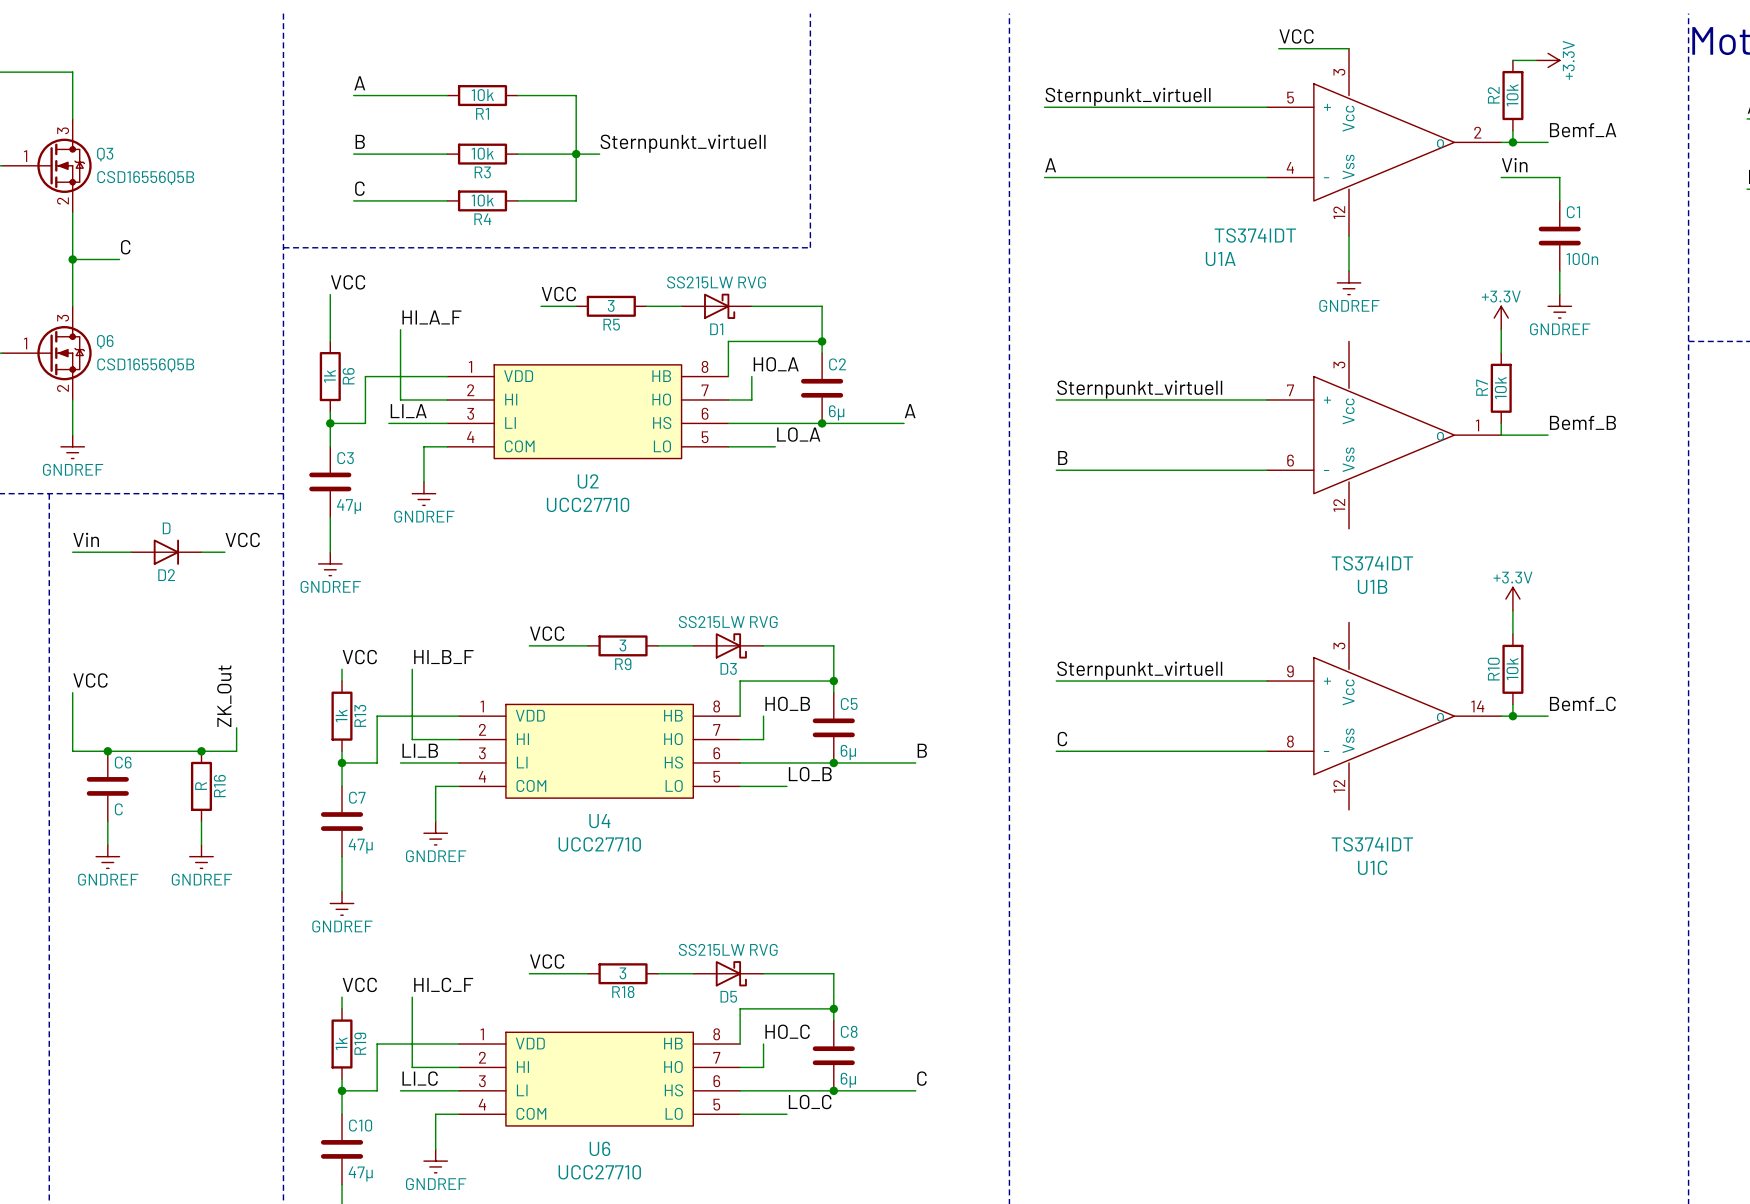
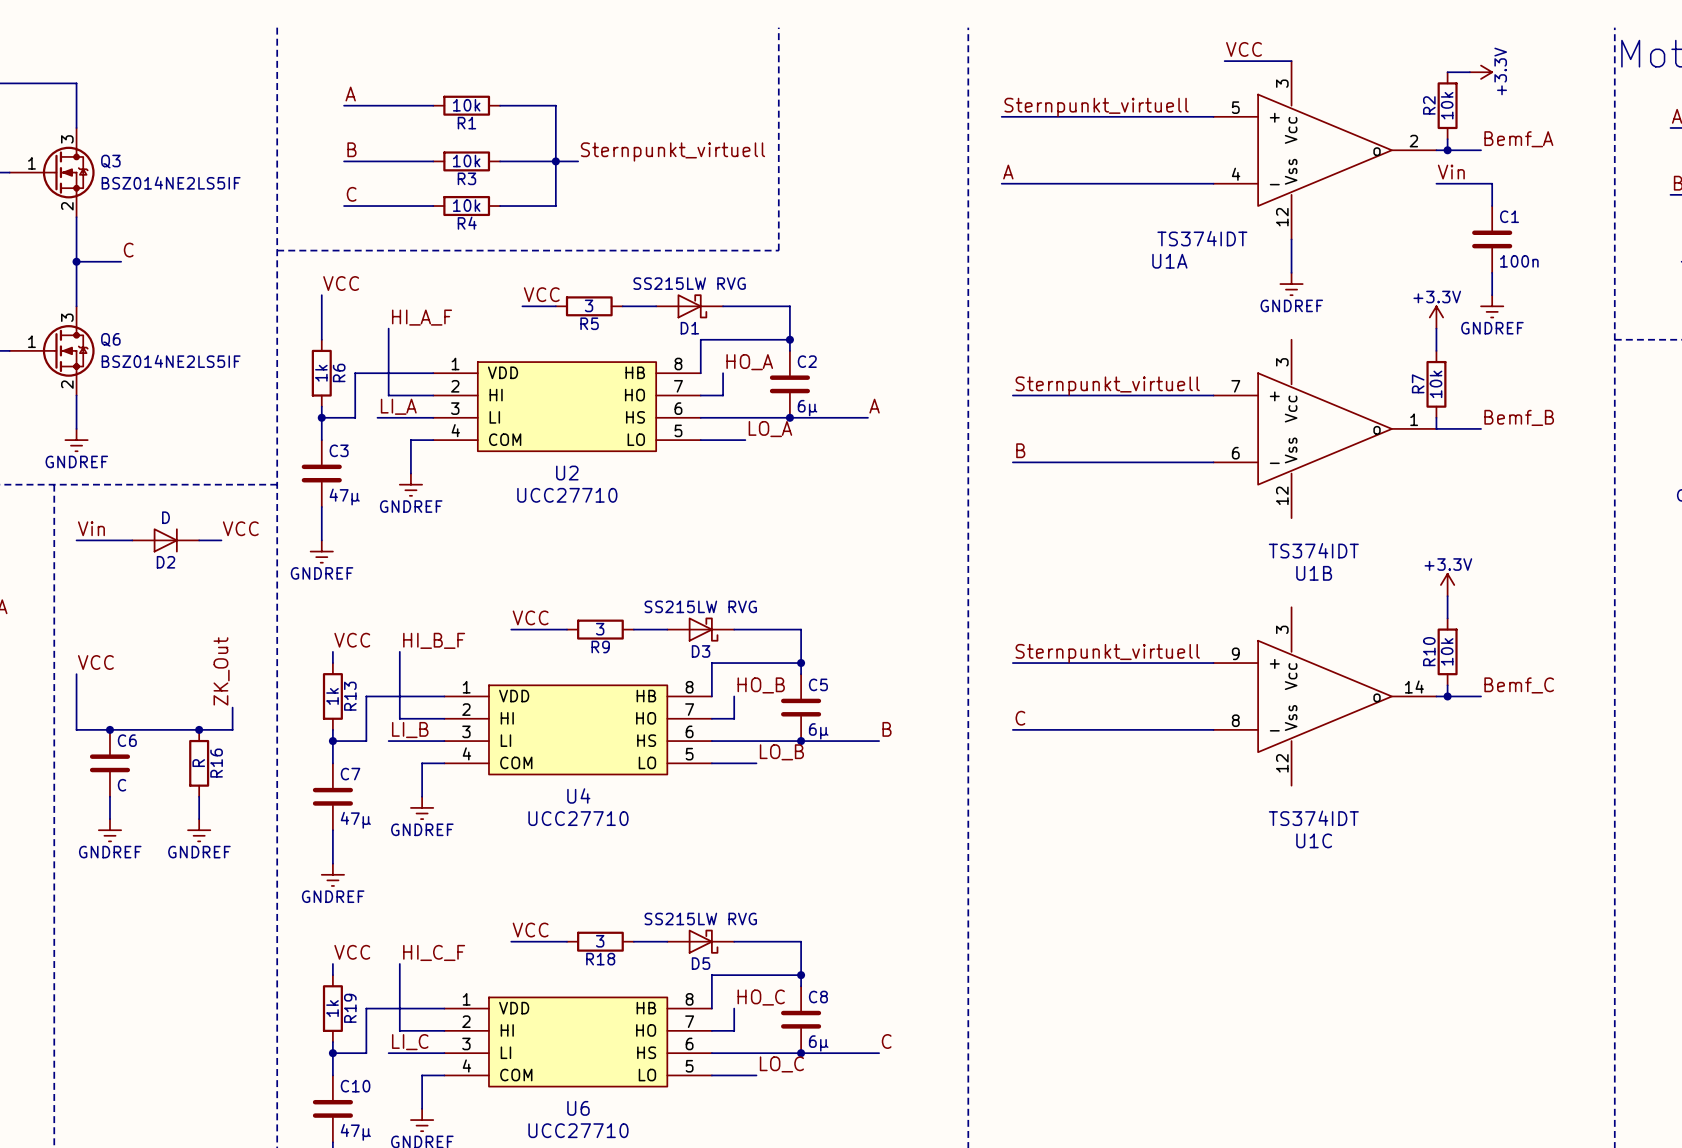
Q3 value: CSD16556Q5B (145, 177) -> BSZ014NE2LS5IF (171, 183)
Q6 value: CSD16556Q5B (145, 365) -> BSZ014NE2LS5IF (171, 361)

